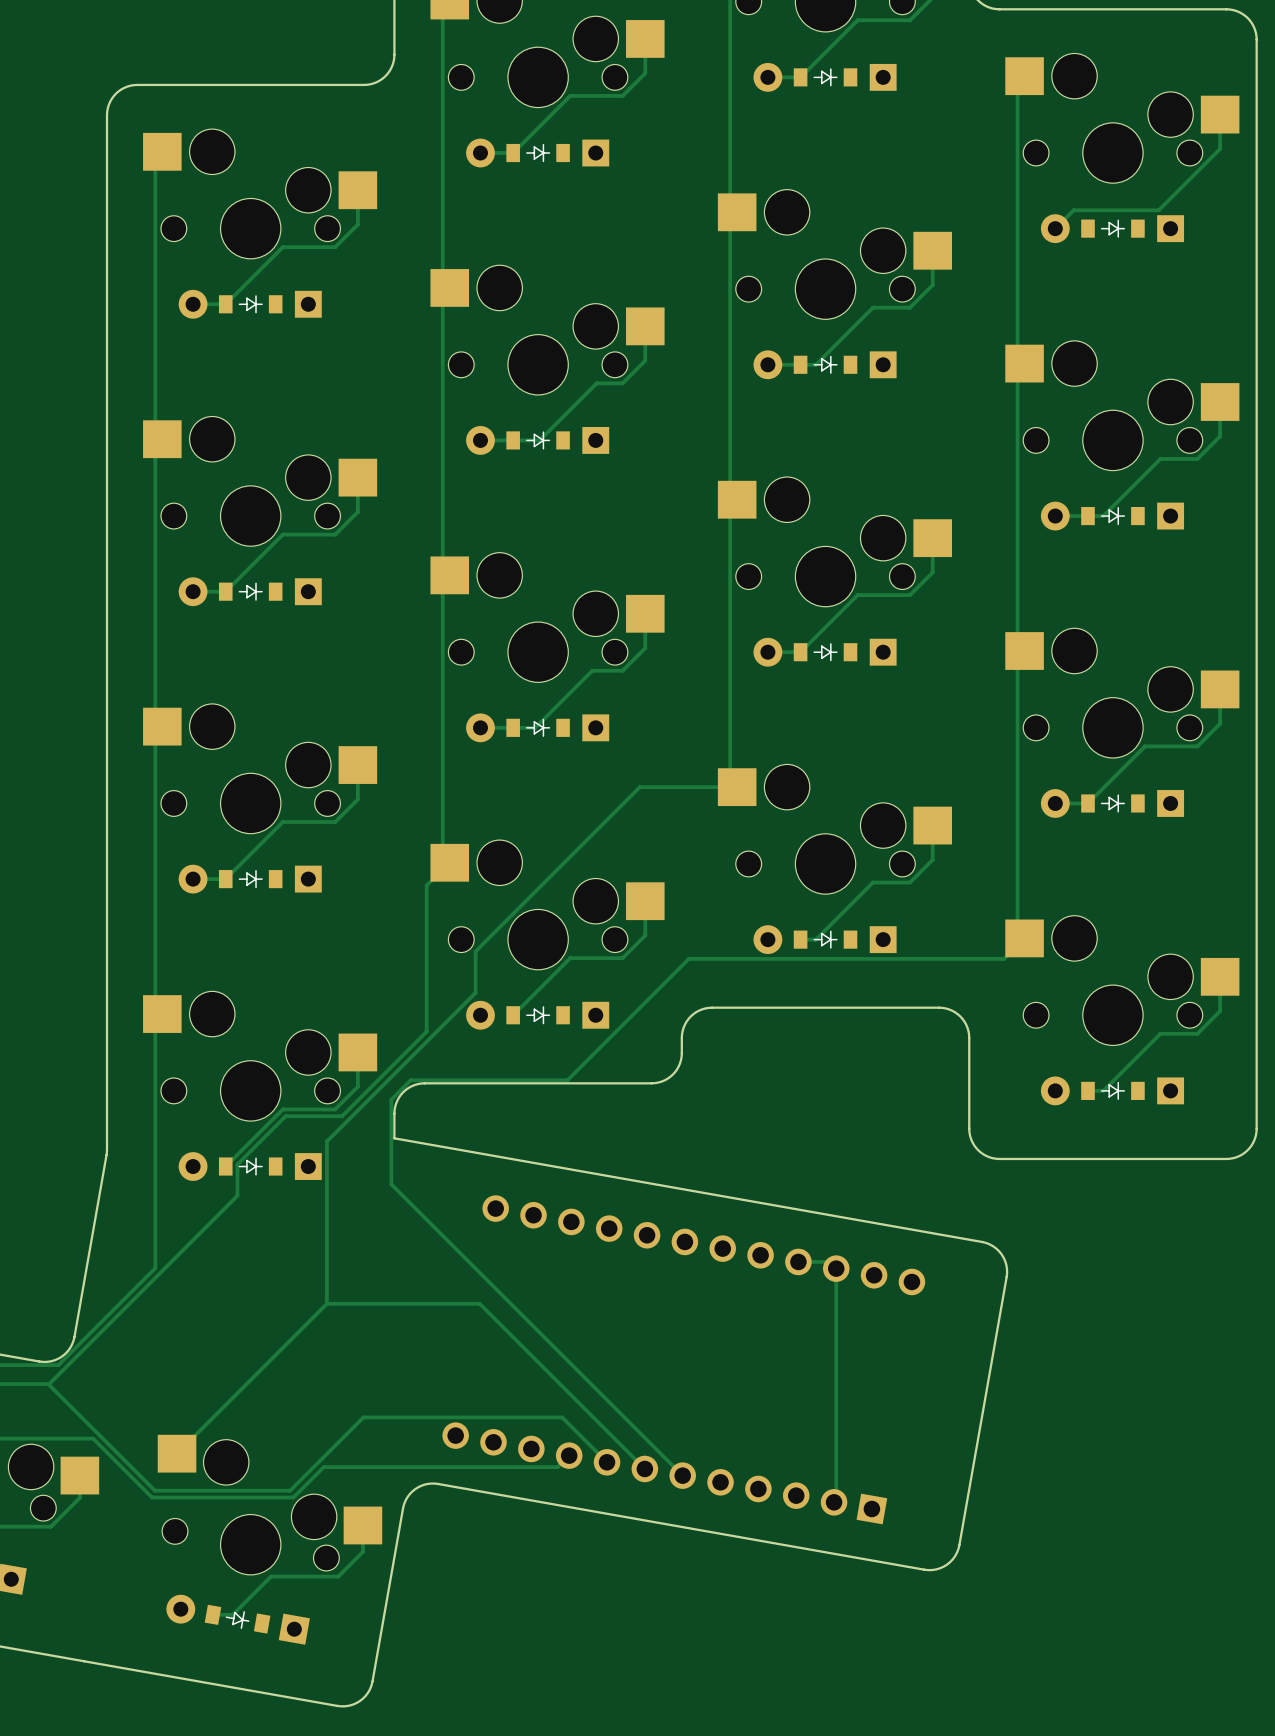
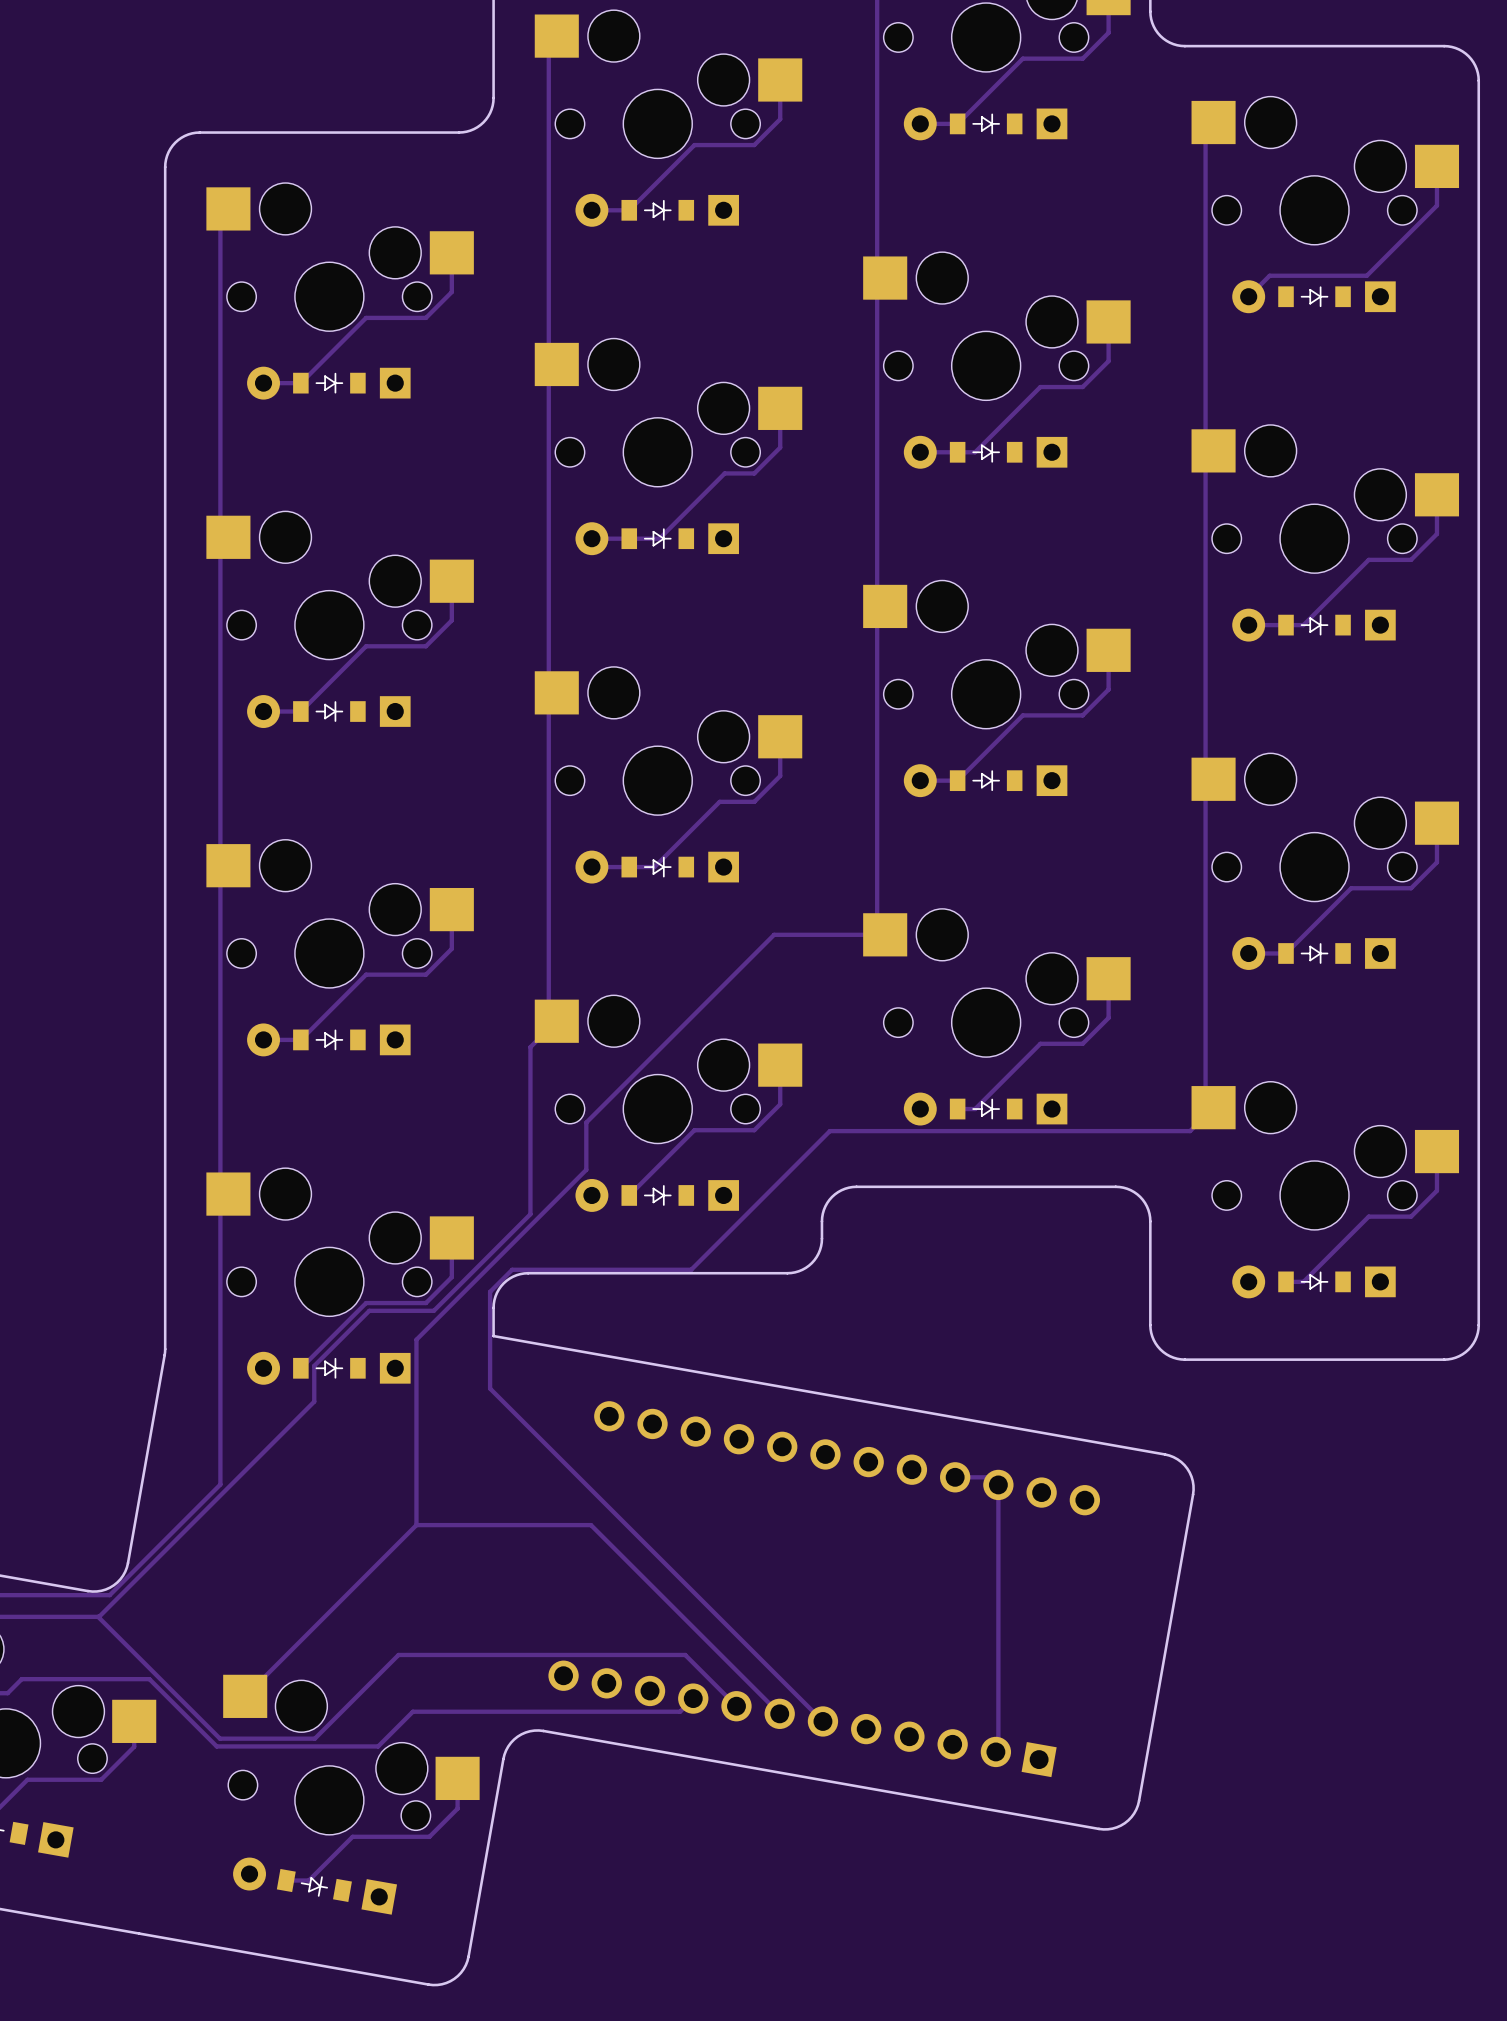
track: (363, 1417) (290, 1490) (237, 1490) -> (458, 1654) (398, 1654) (314, 1738)

